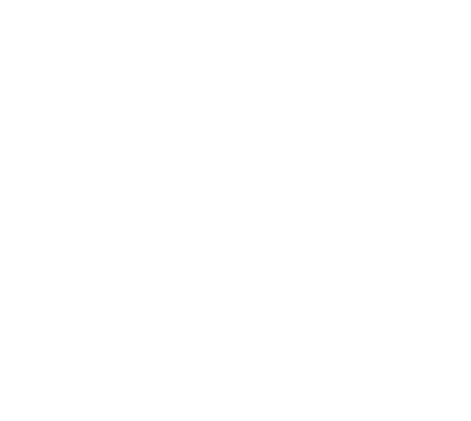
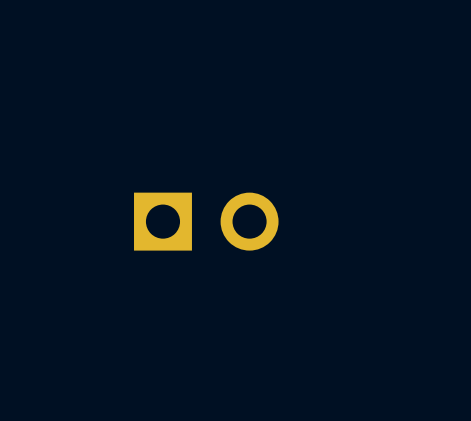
part: none -> (206, 221)

